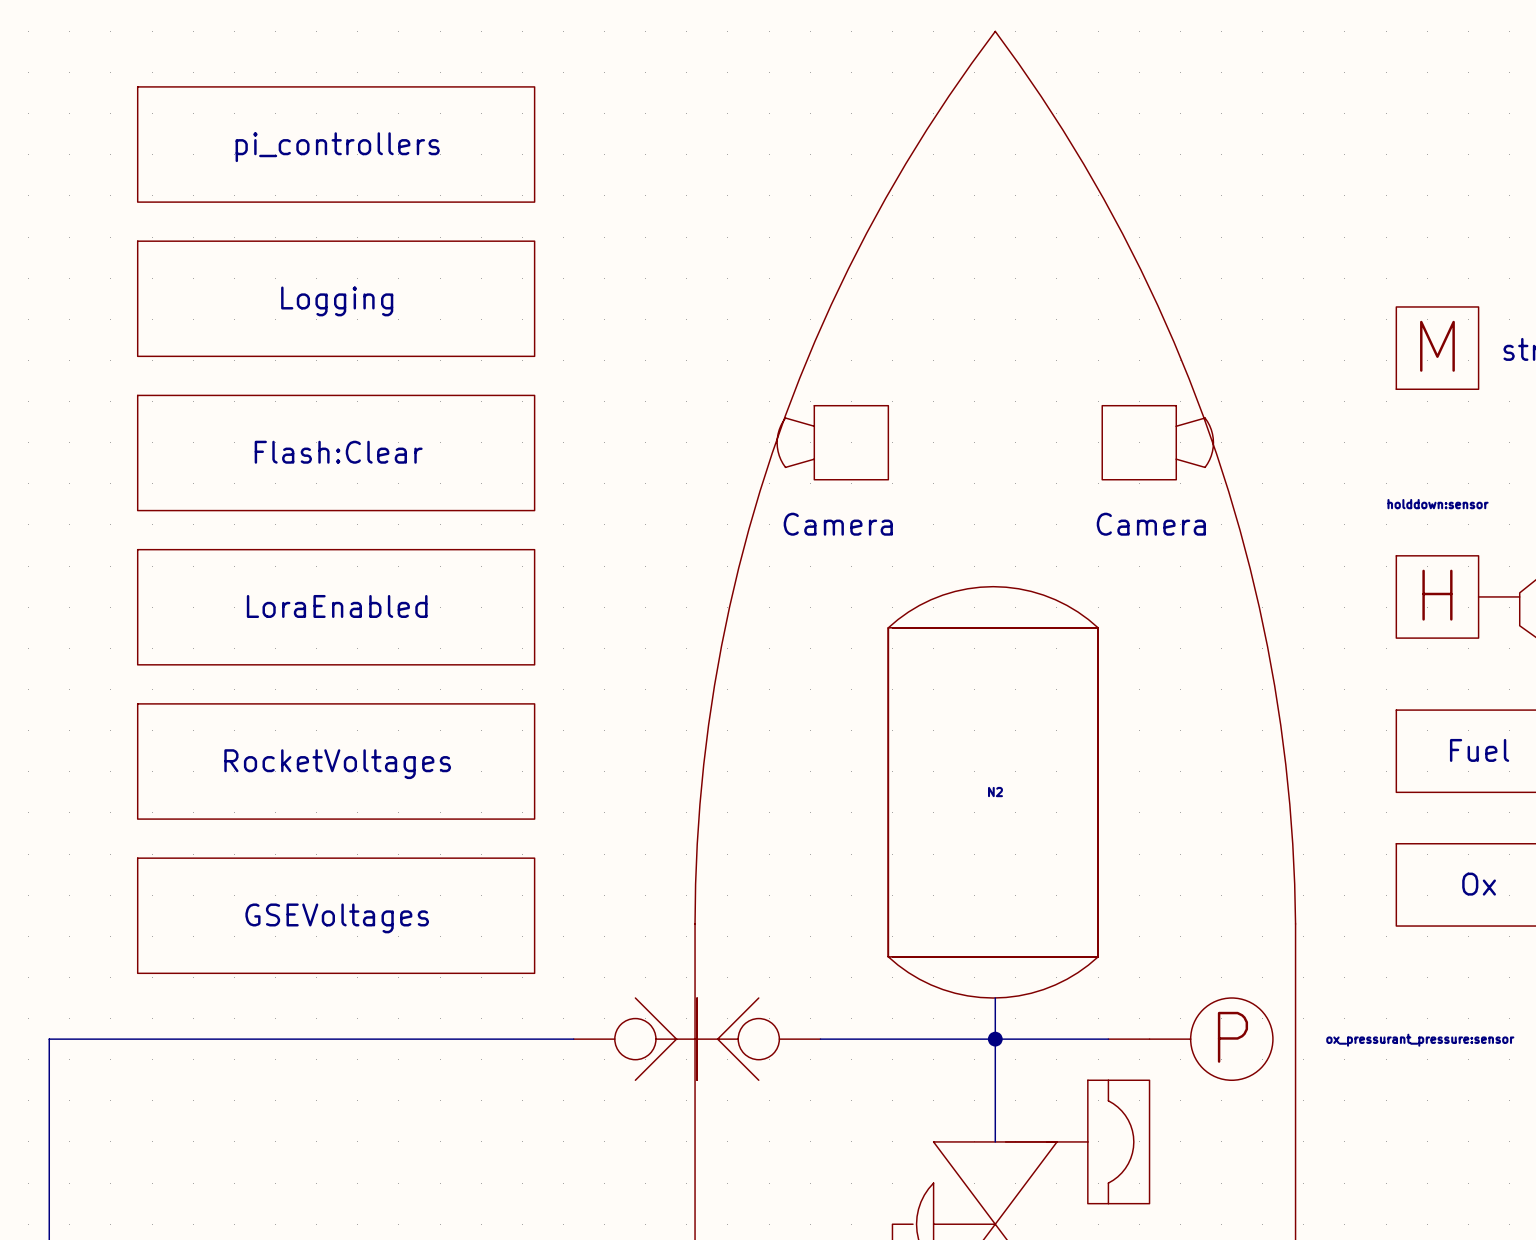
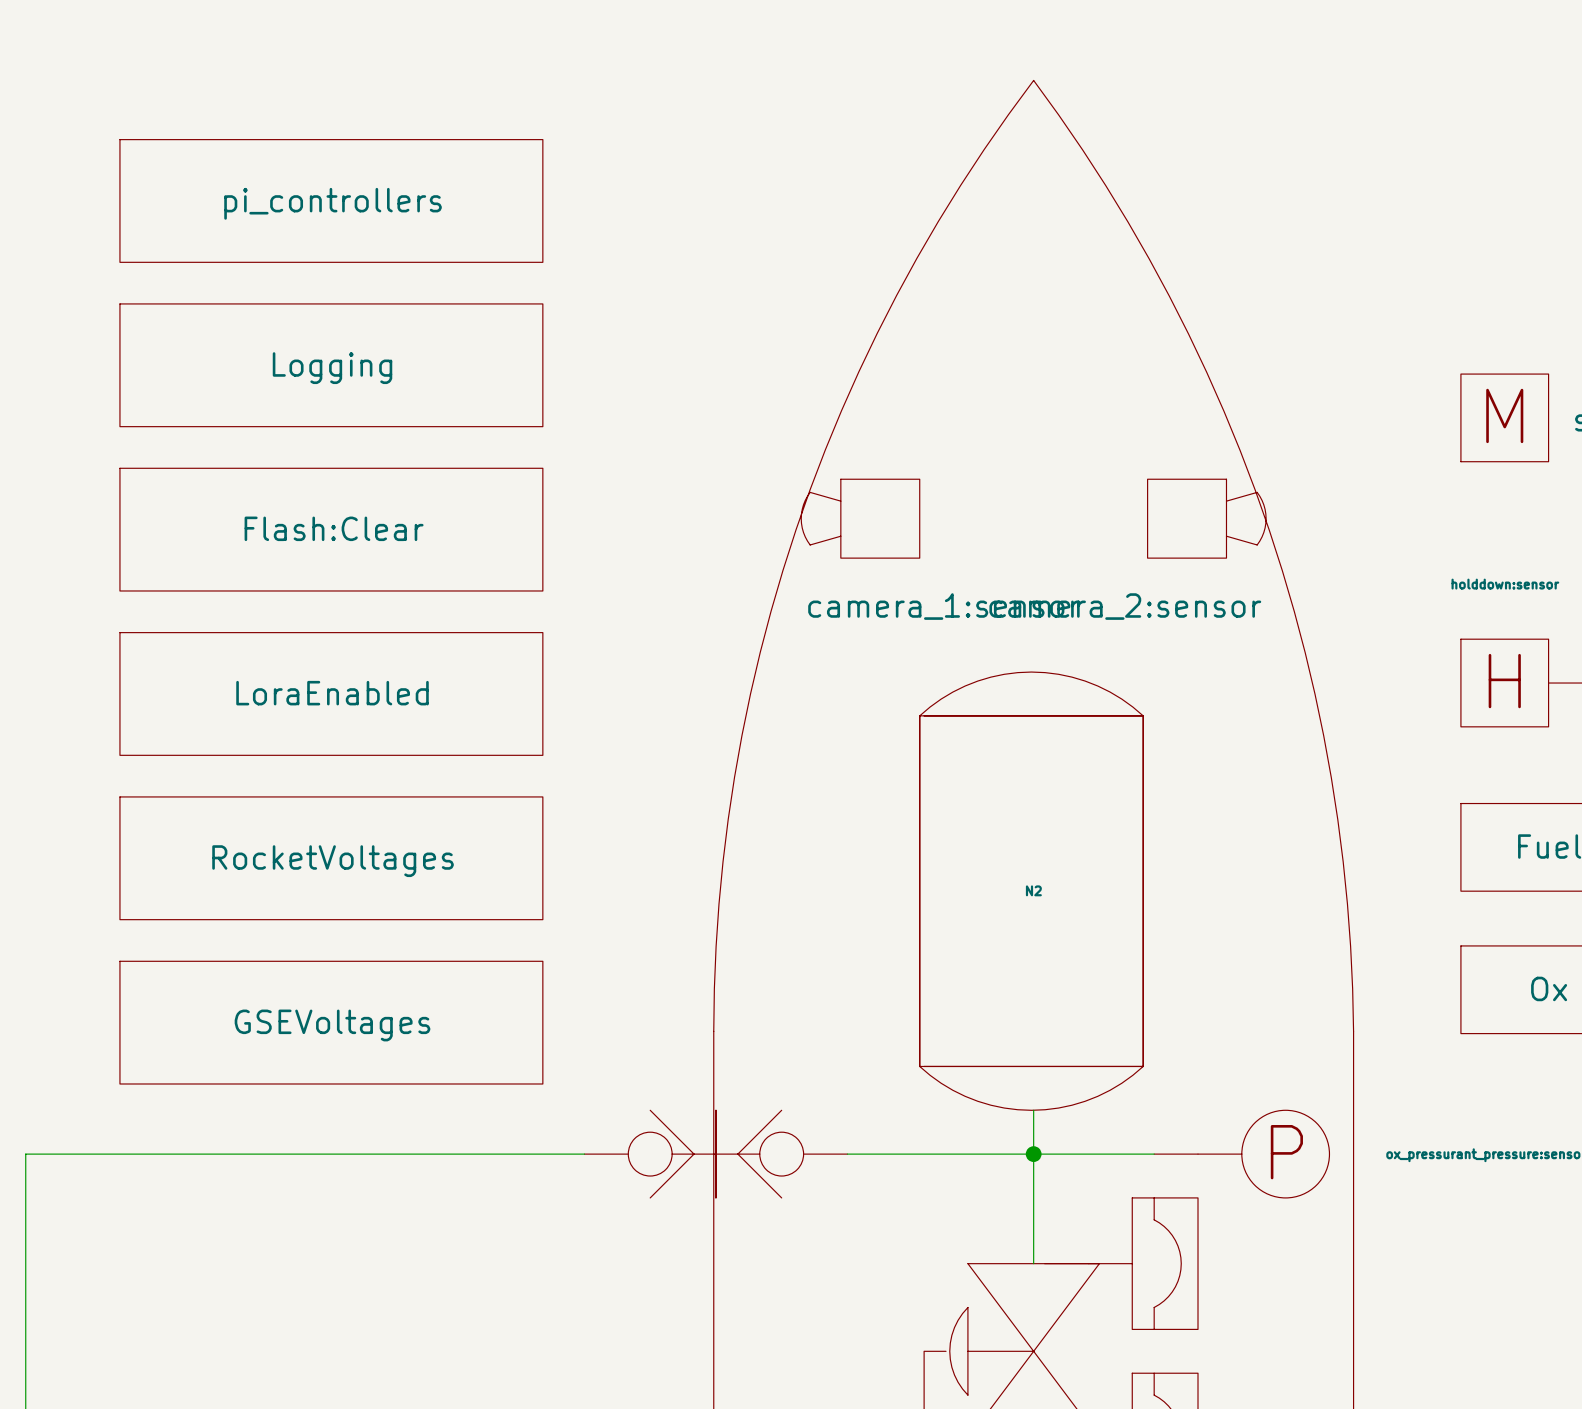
part value: Camera (838, 524) -> camera_1:sensor (944, 606)
part value: Camera (1151, 524) -> camera_2:sensor (1125, 606)

